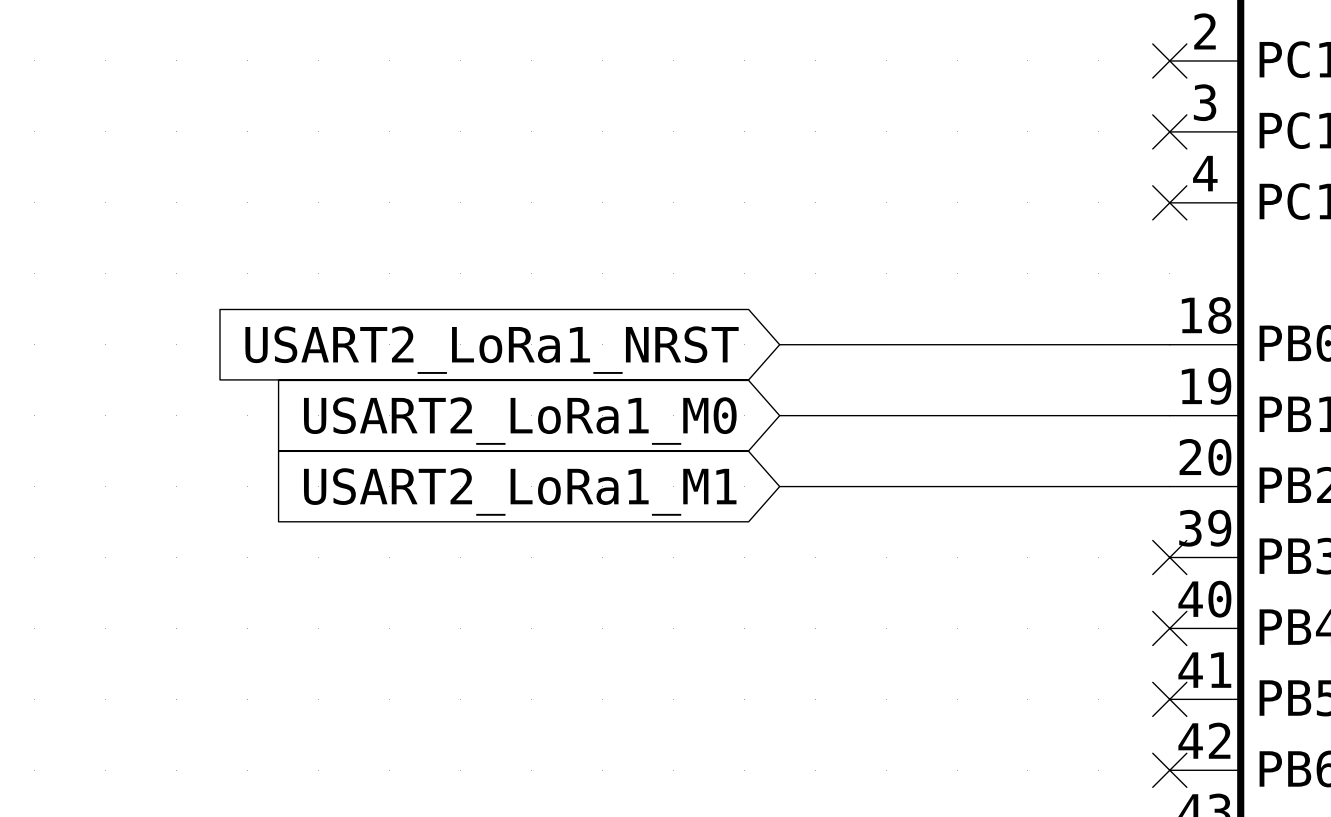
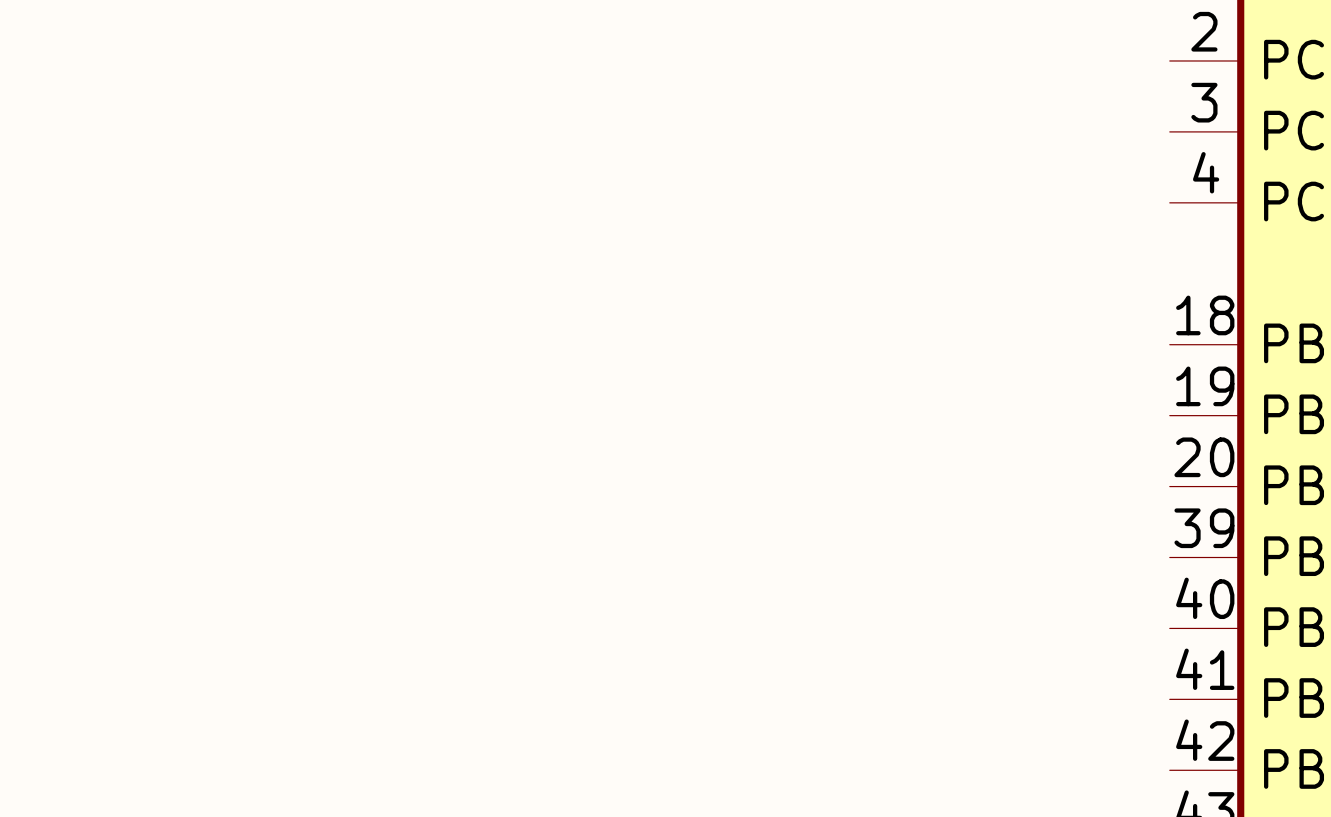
no-connect mark: (1169, 60) -> none
no-connect mark: (1169, 131) -> none
no-connect mark: (1169, 202) -> none
wire: (779, 344) (1169, 344) -> none
global label: USART2_LoRa1_NRST (492, 350) -> none
wire: (779, 415) (1169, 415) -> none
global label: USART2_LoRa1_M0 (520, 421) -> none
wire: (779, 486) (1169, 486) -> none
global label: USART2_LoRa1_M1 (520, 491) -> none
no-connect mark: (1169, 557) -> none
no-connect mark: (1169, 628) -> none
no-connect mark: (1169, 699) -> none
no-connect mark: (1169, 770) -> none

